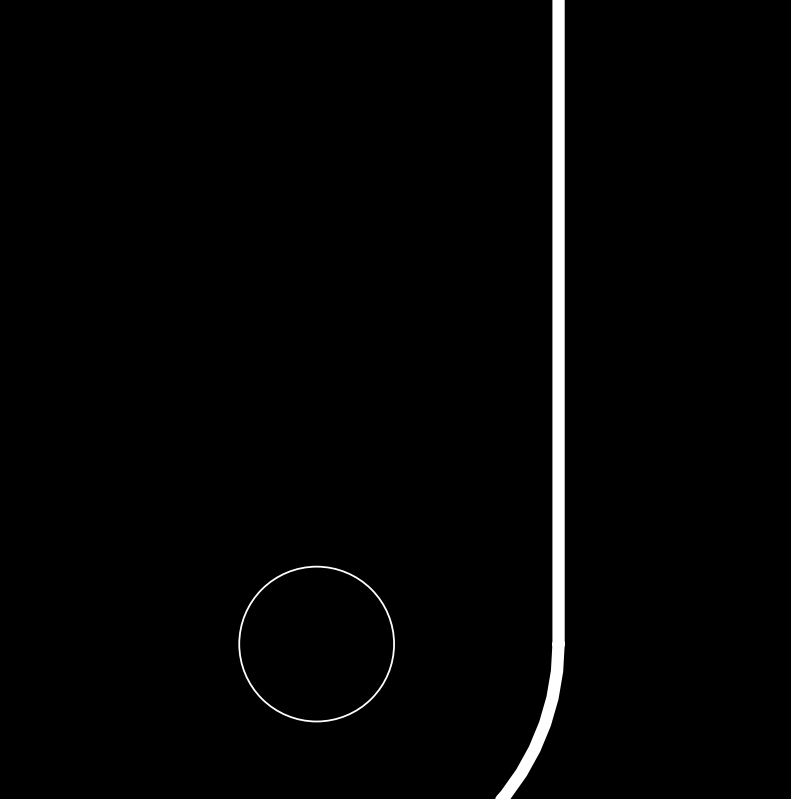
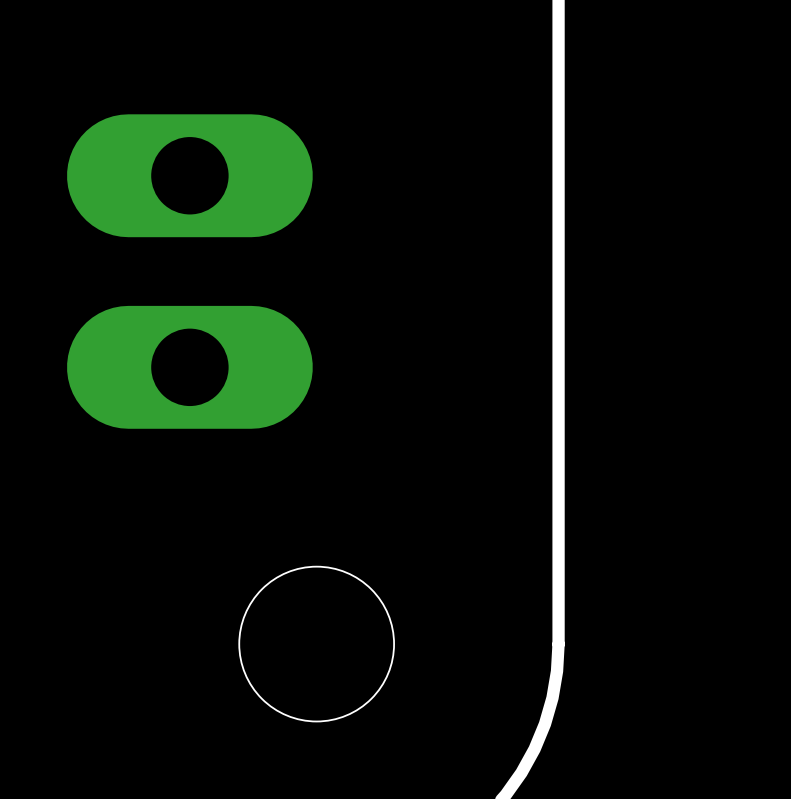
part: none -> (189, 271)

